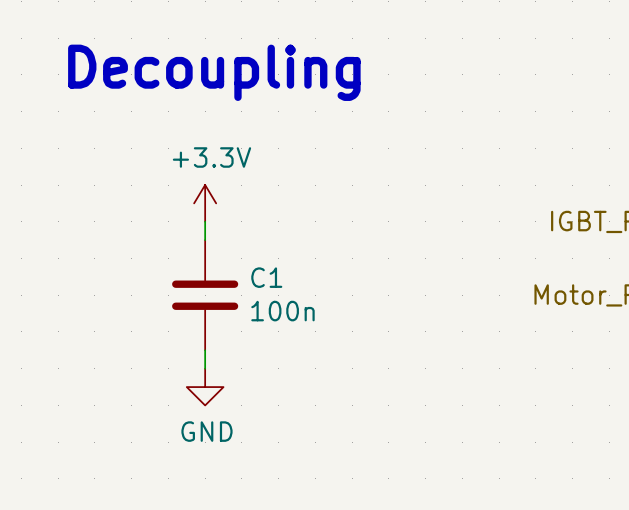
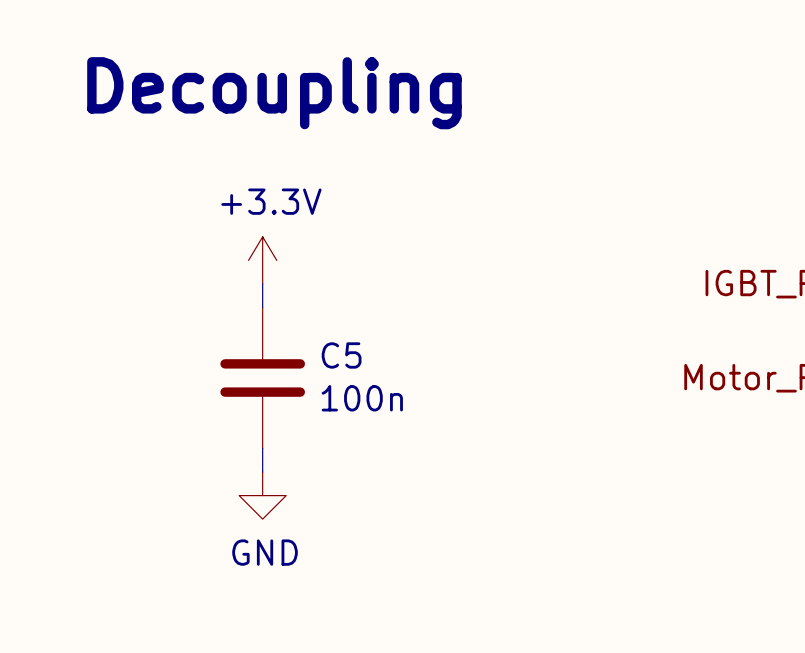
C1 name: C1 (266, 277) -> C5 (341, 355)

